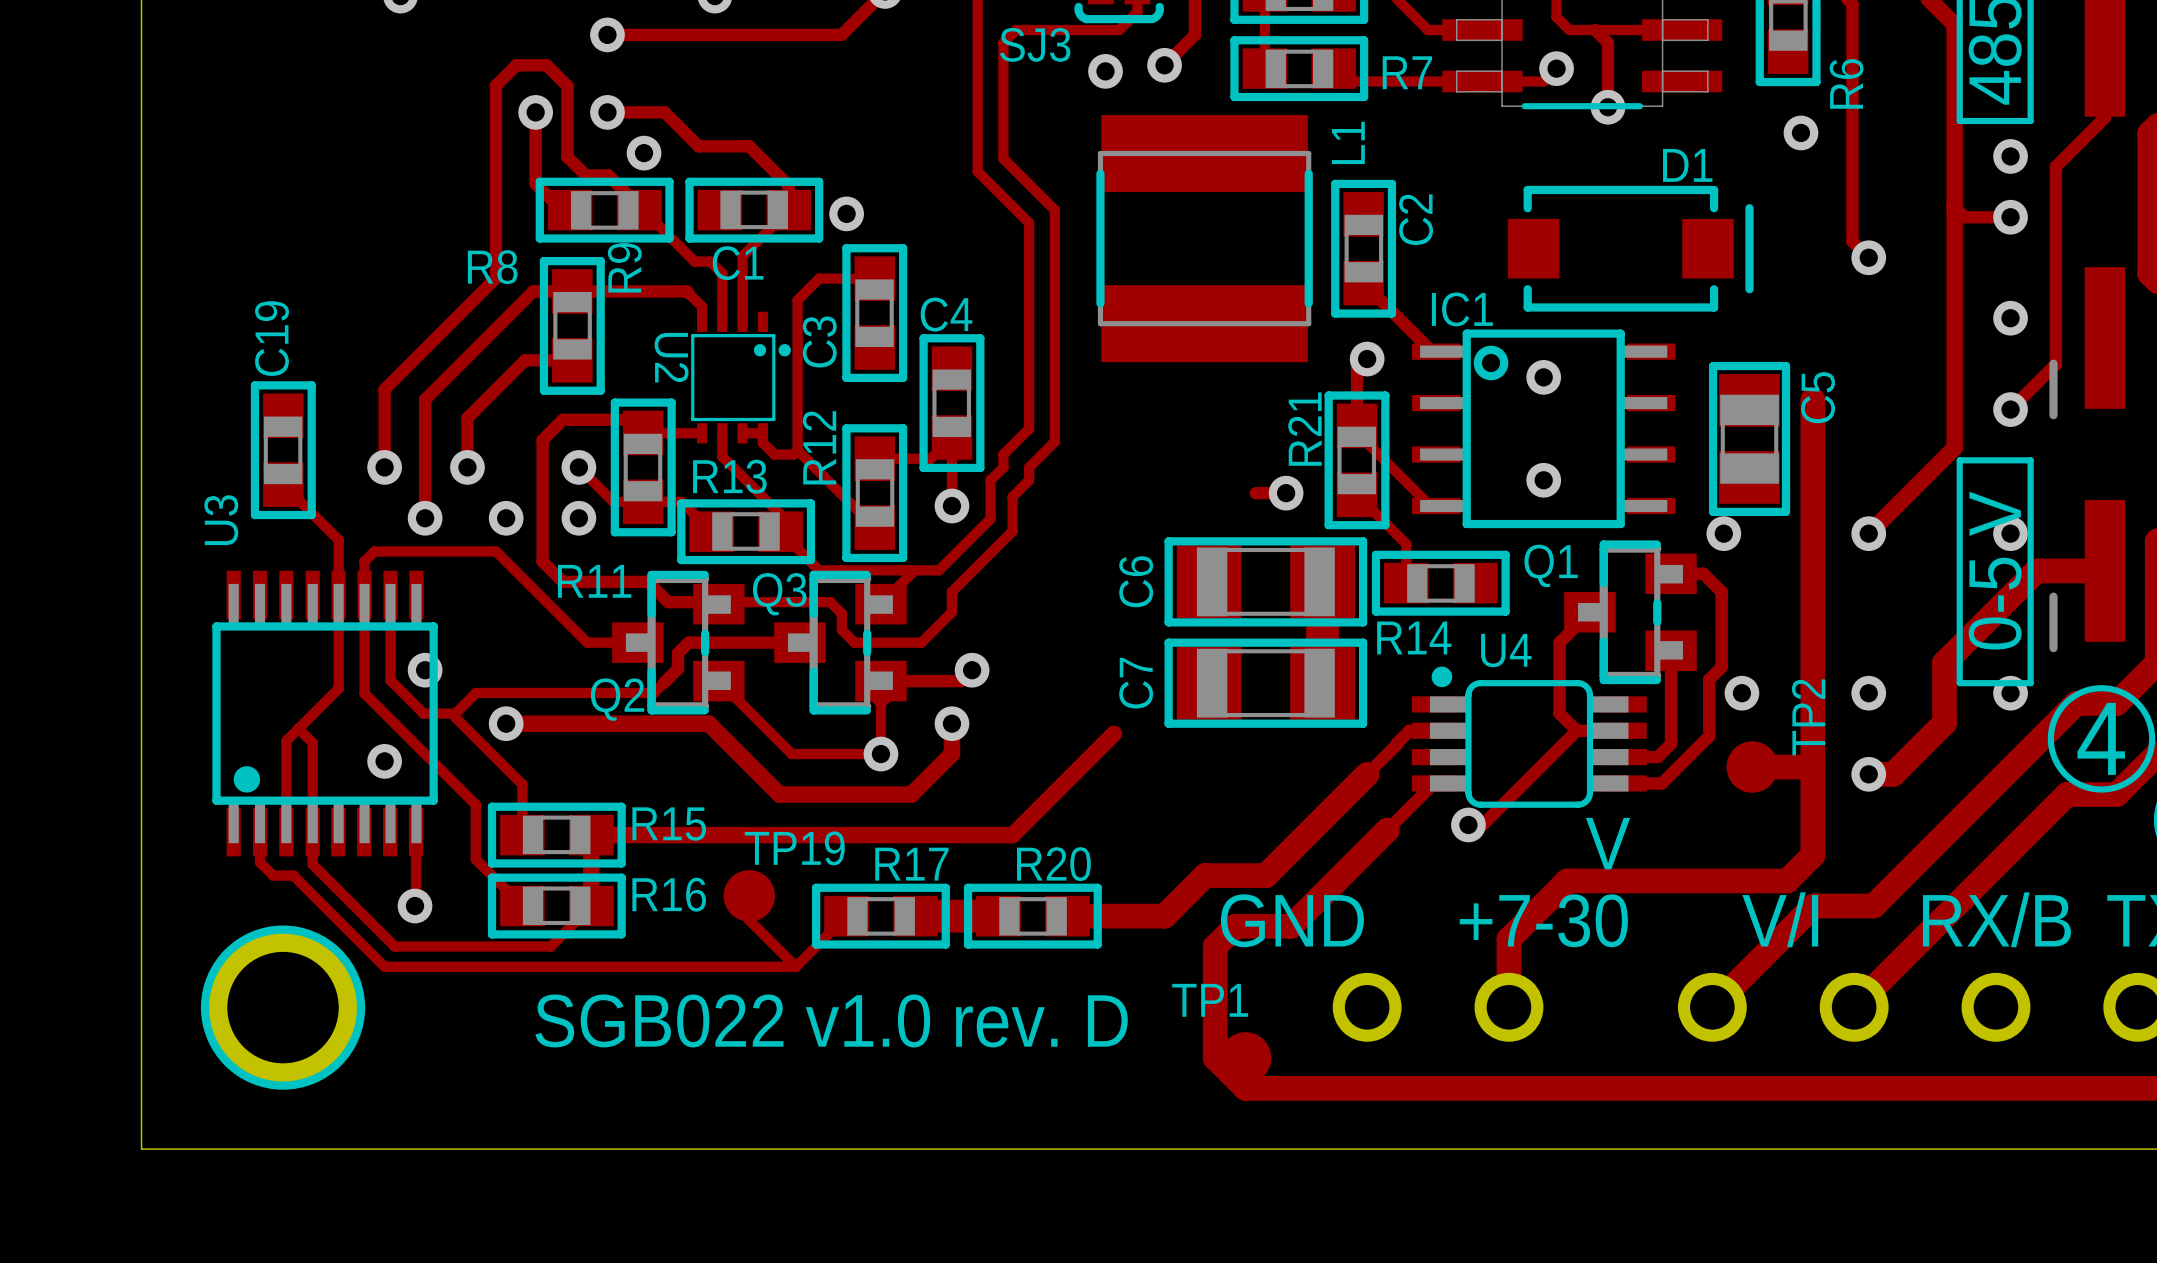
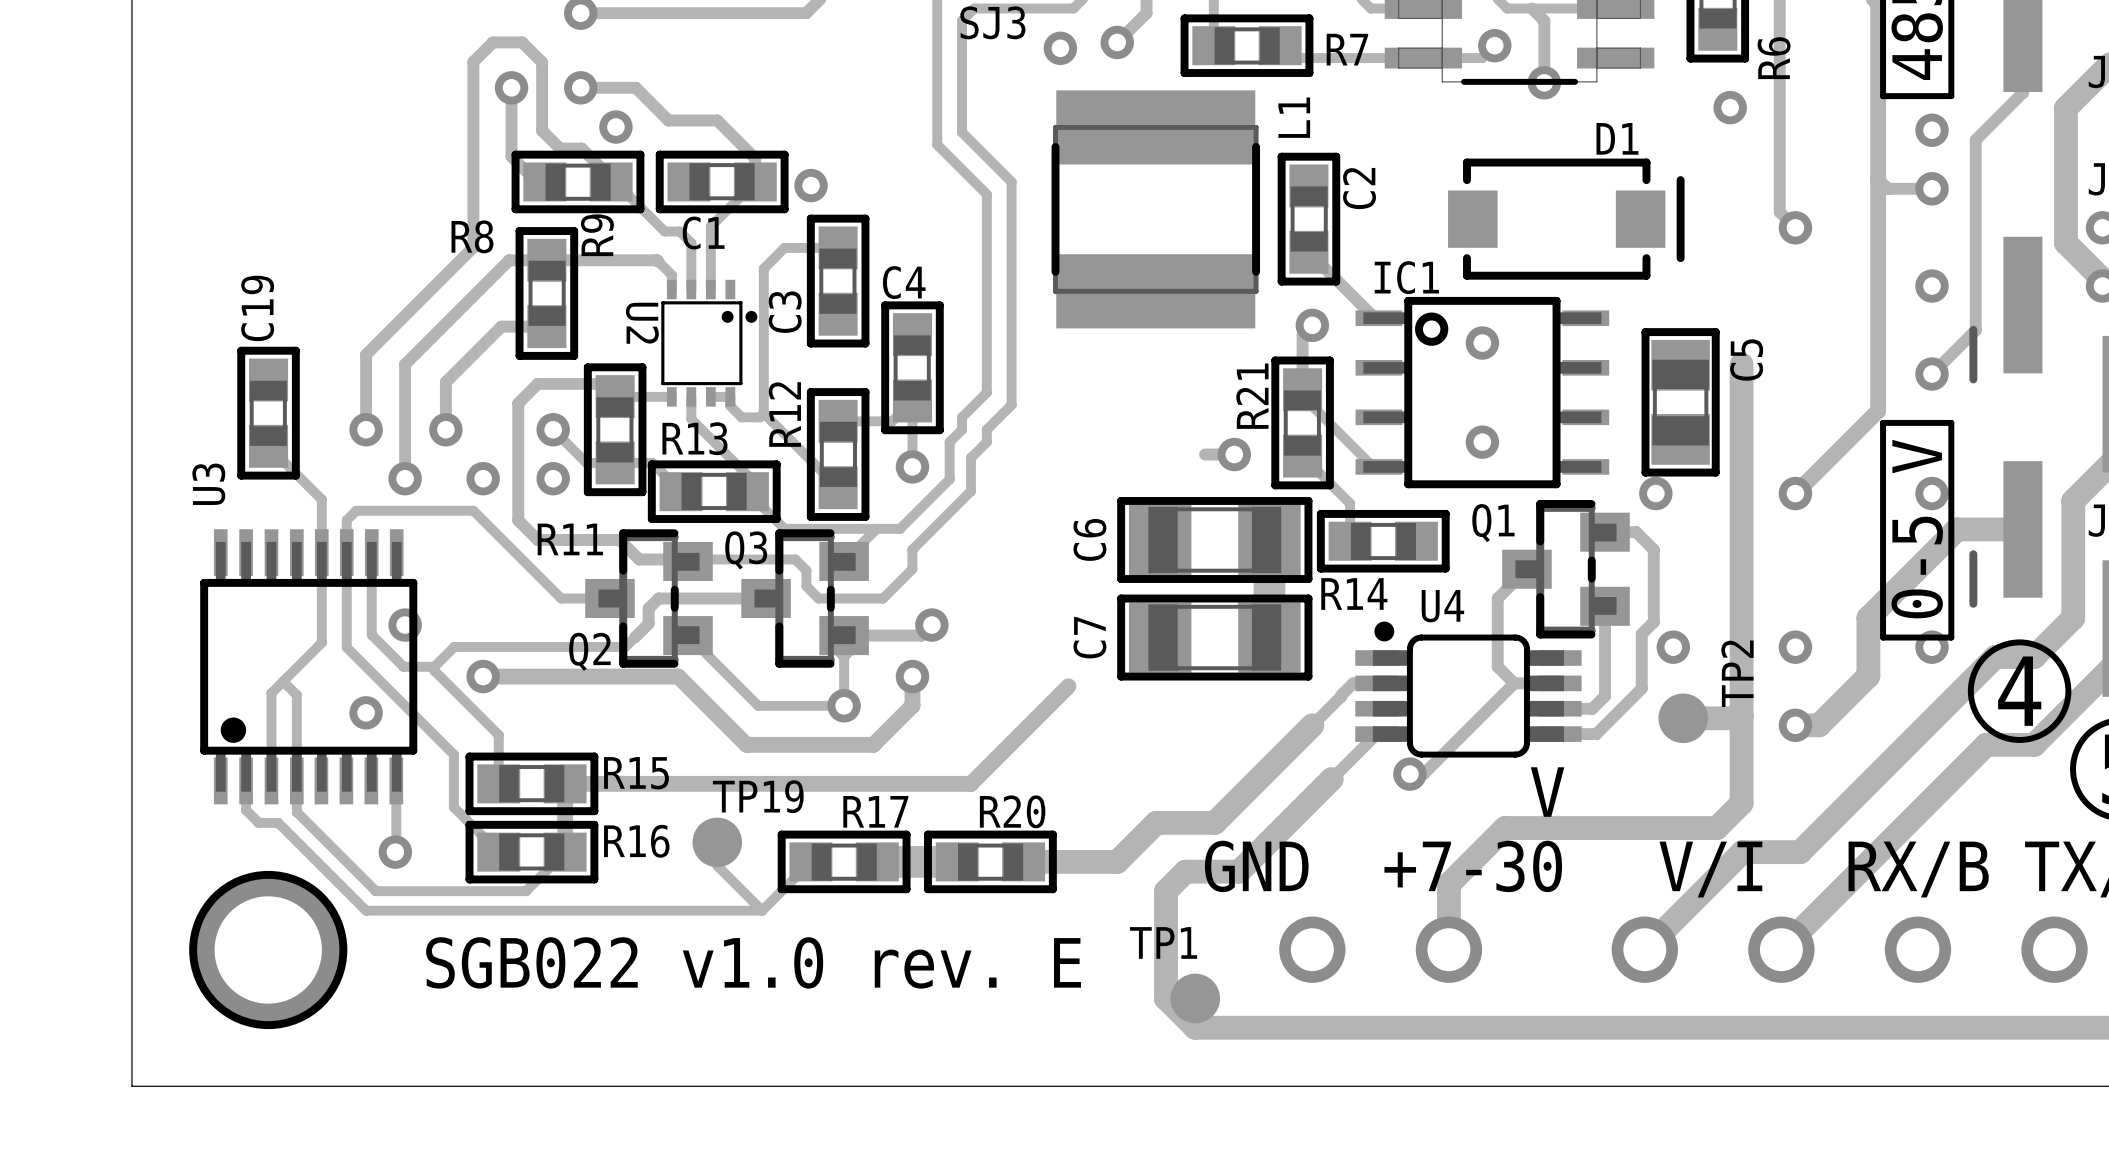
text: SGB022 v1.0 rev. D (831, 1020) -> SGB022 v1.0 rev. E (753, 962)

